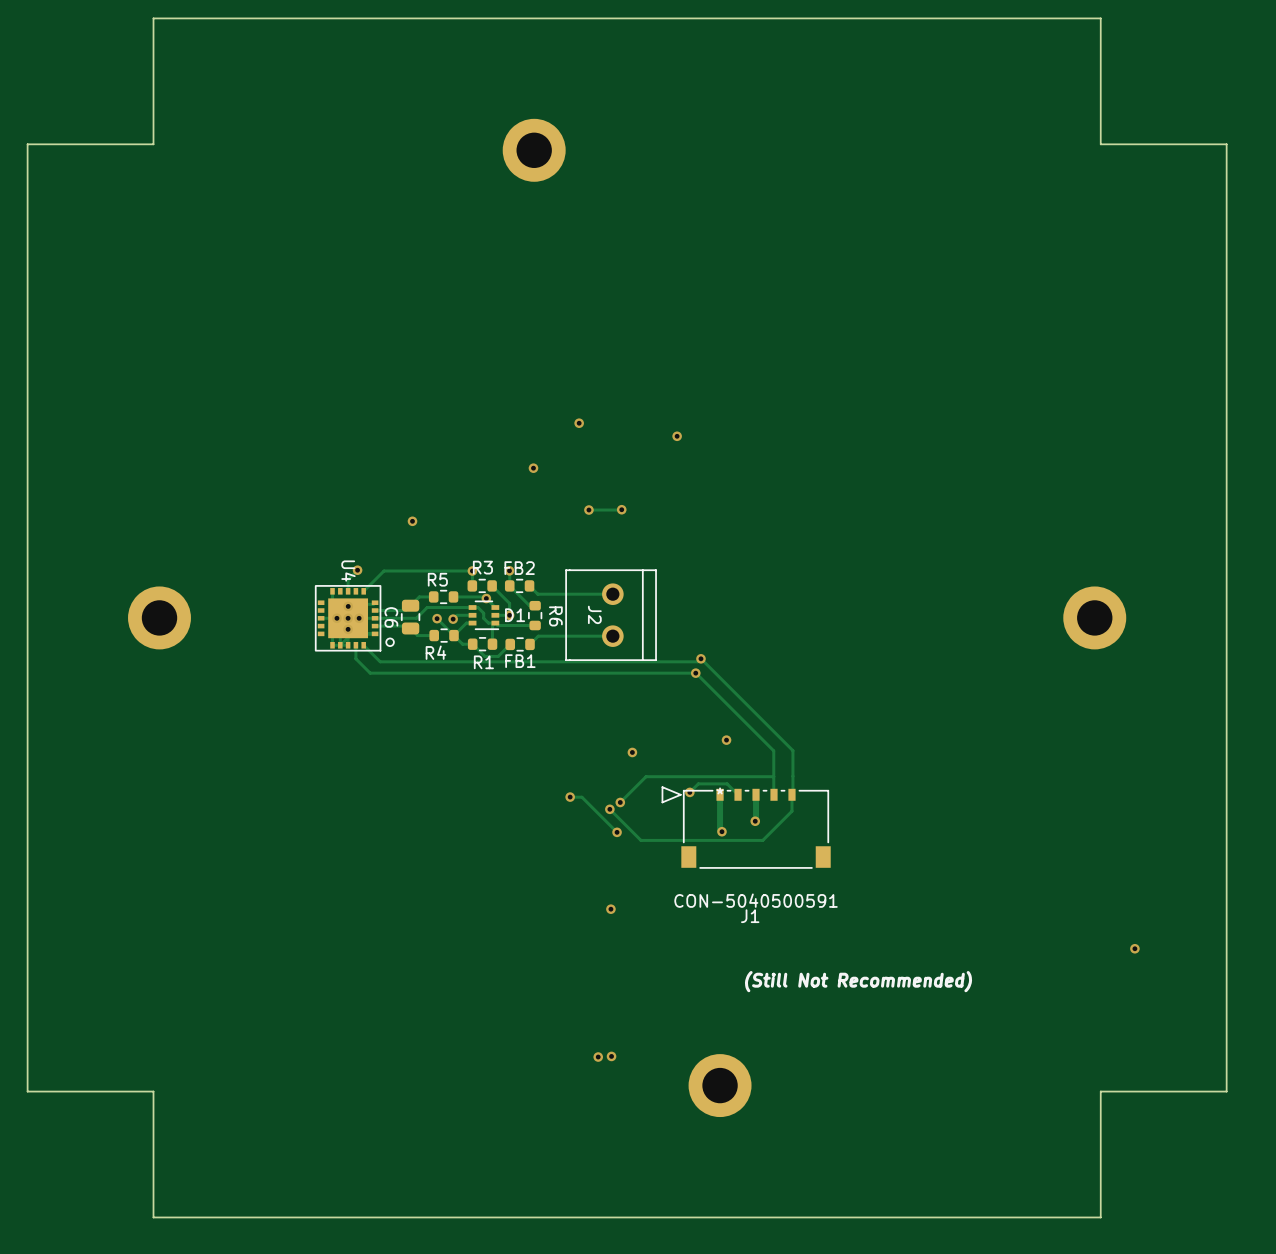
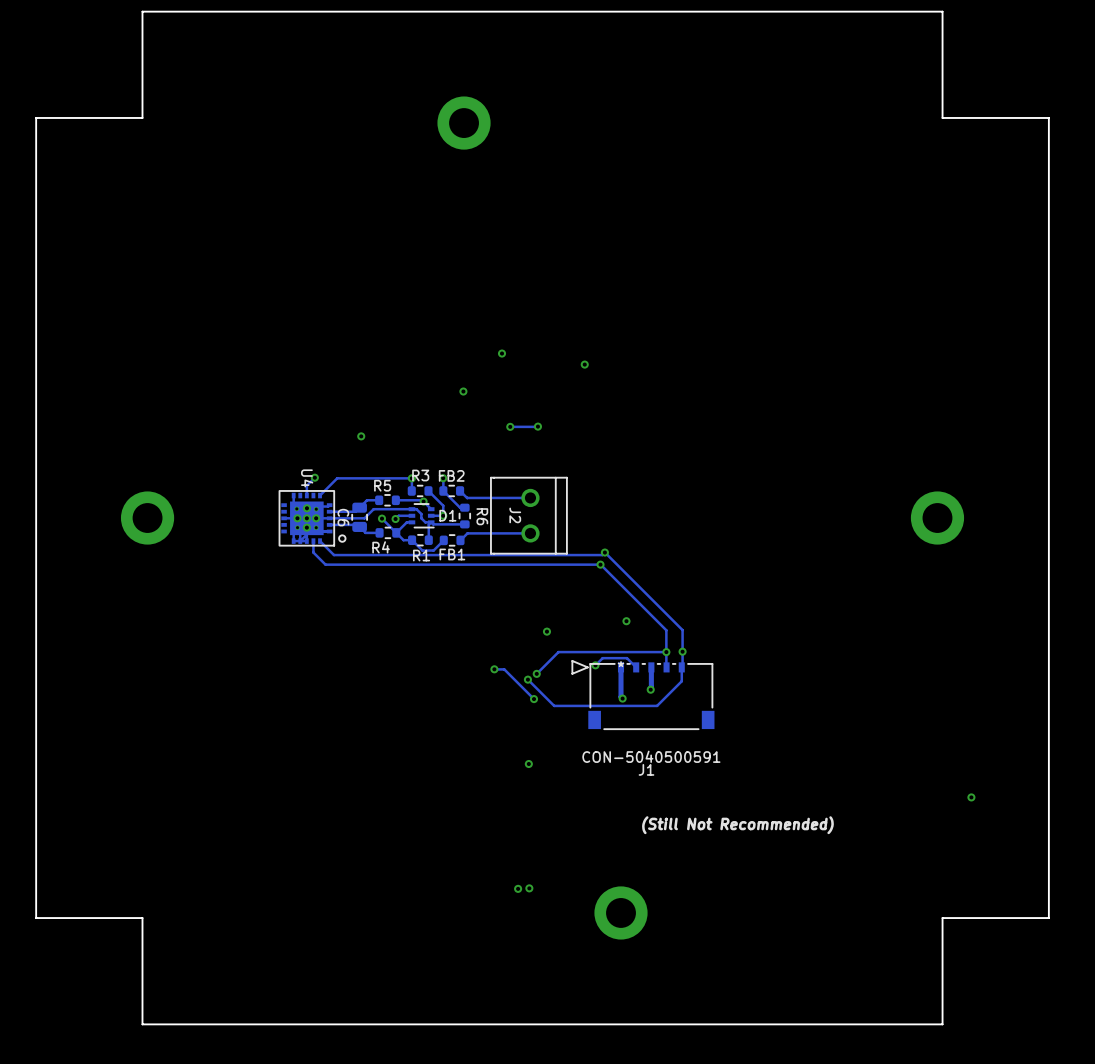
via: none -> (296, 508)
via: none -> (316, 509)
via: none -> (297, 527)
via: none -> (316, 527)
via: none -> (666, 652)
via: none -> (682, 651)

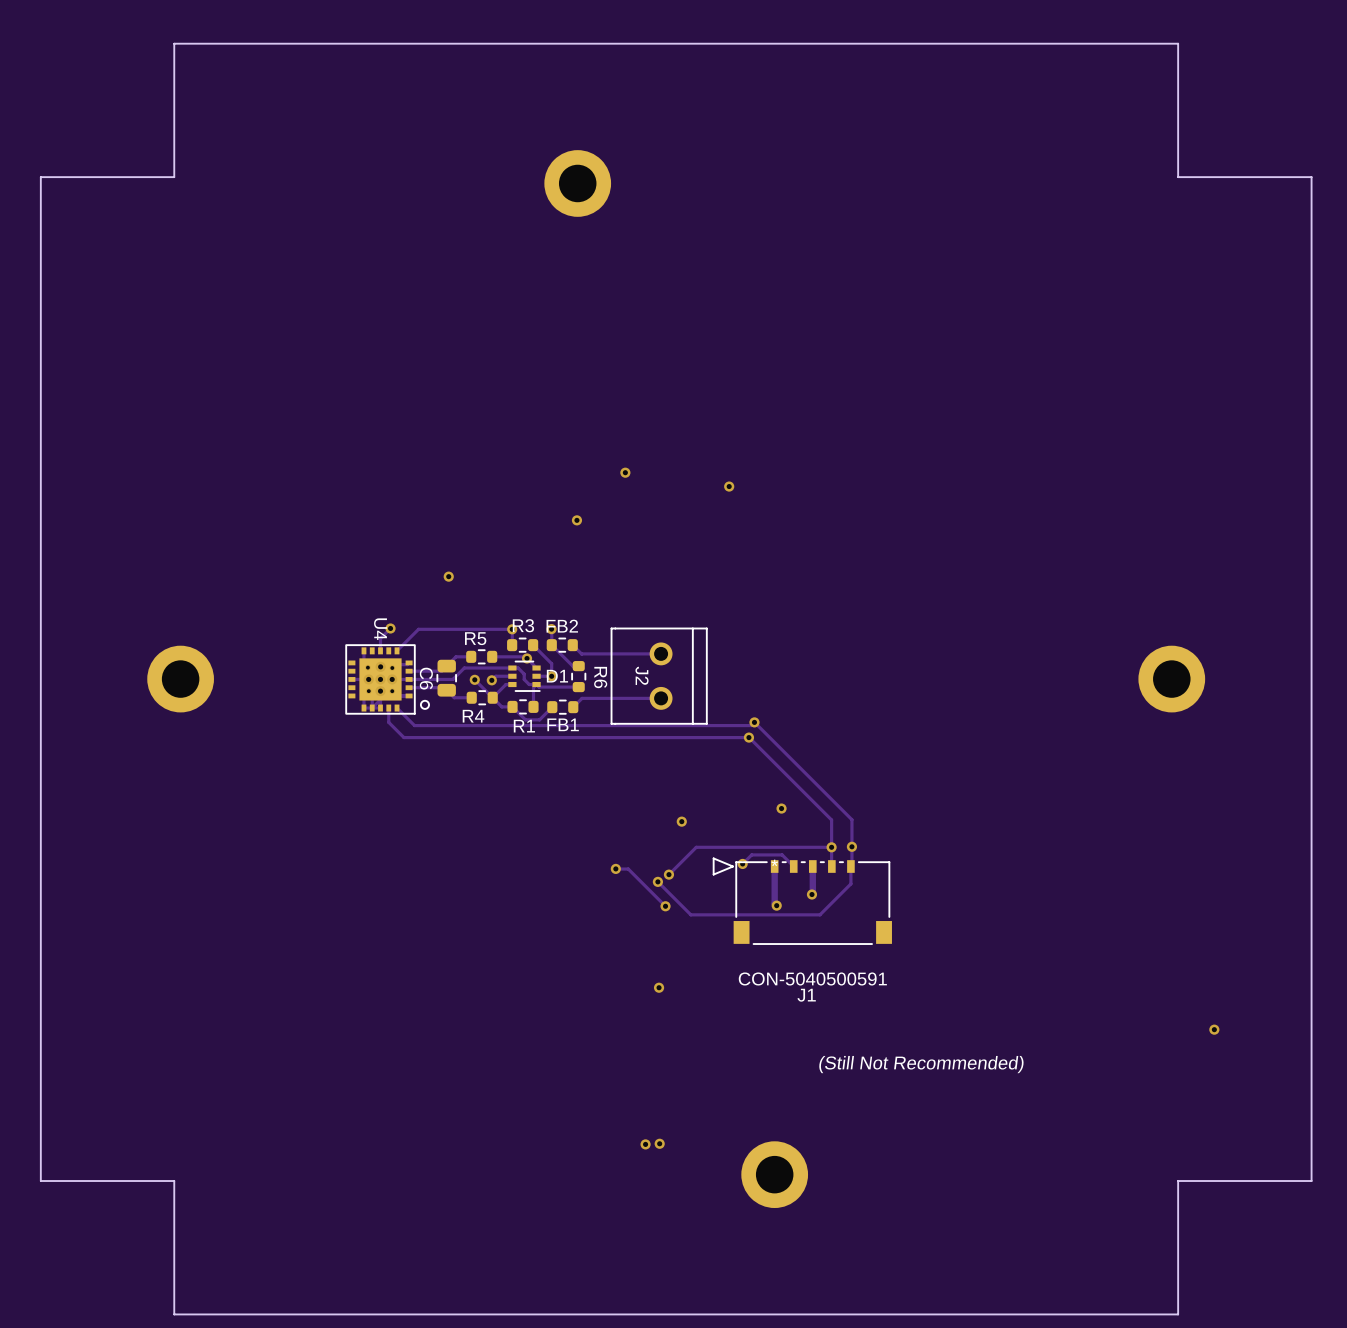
via: (510, 426) -> none
track: (537, 426) (510, 426) -> none
via: (537, 426) -> none

